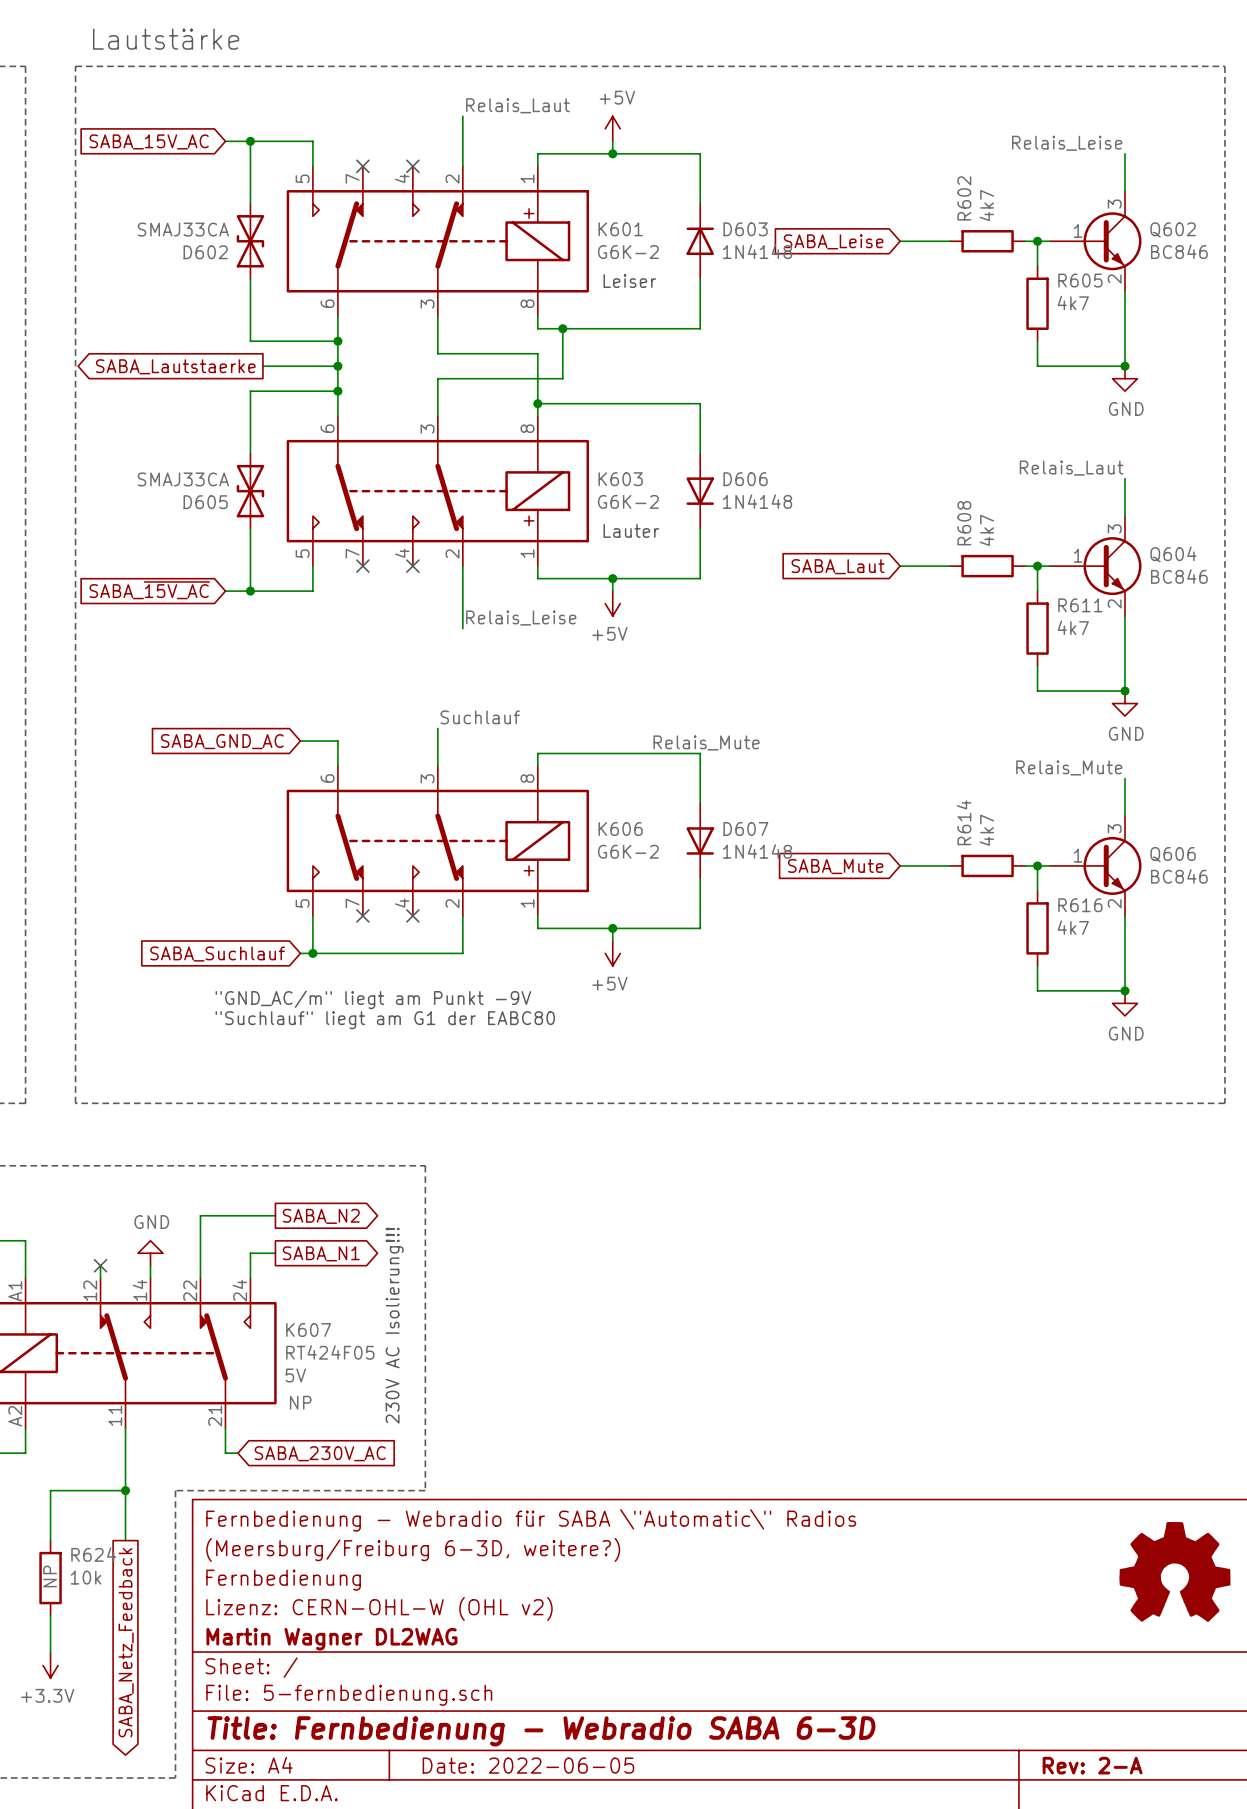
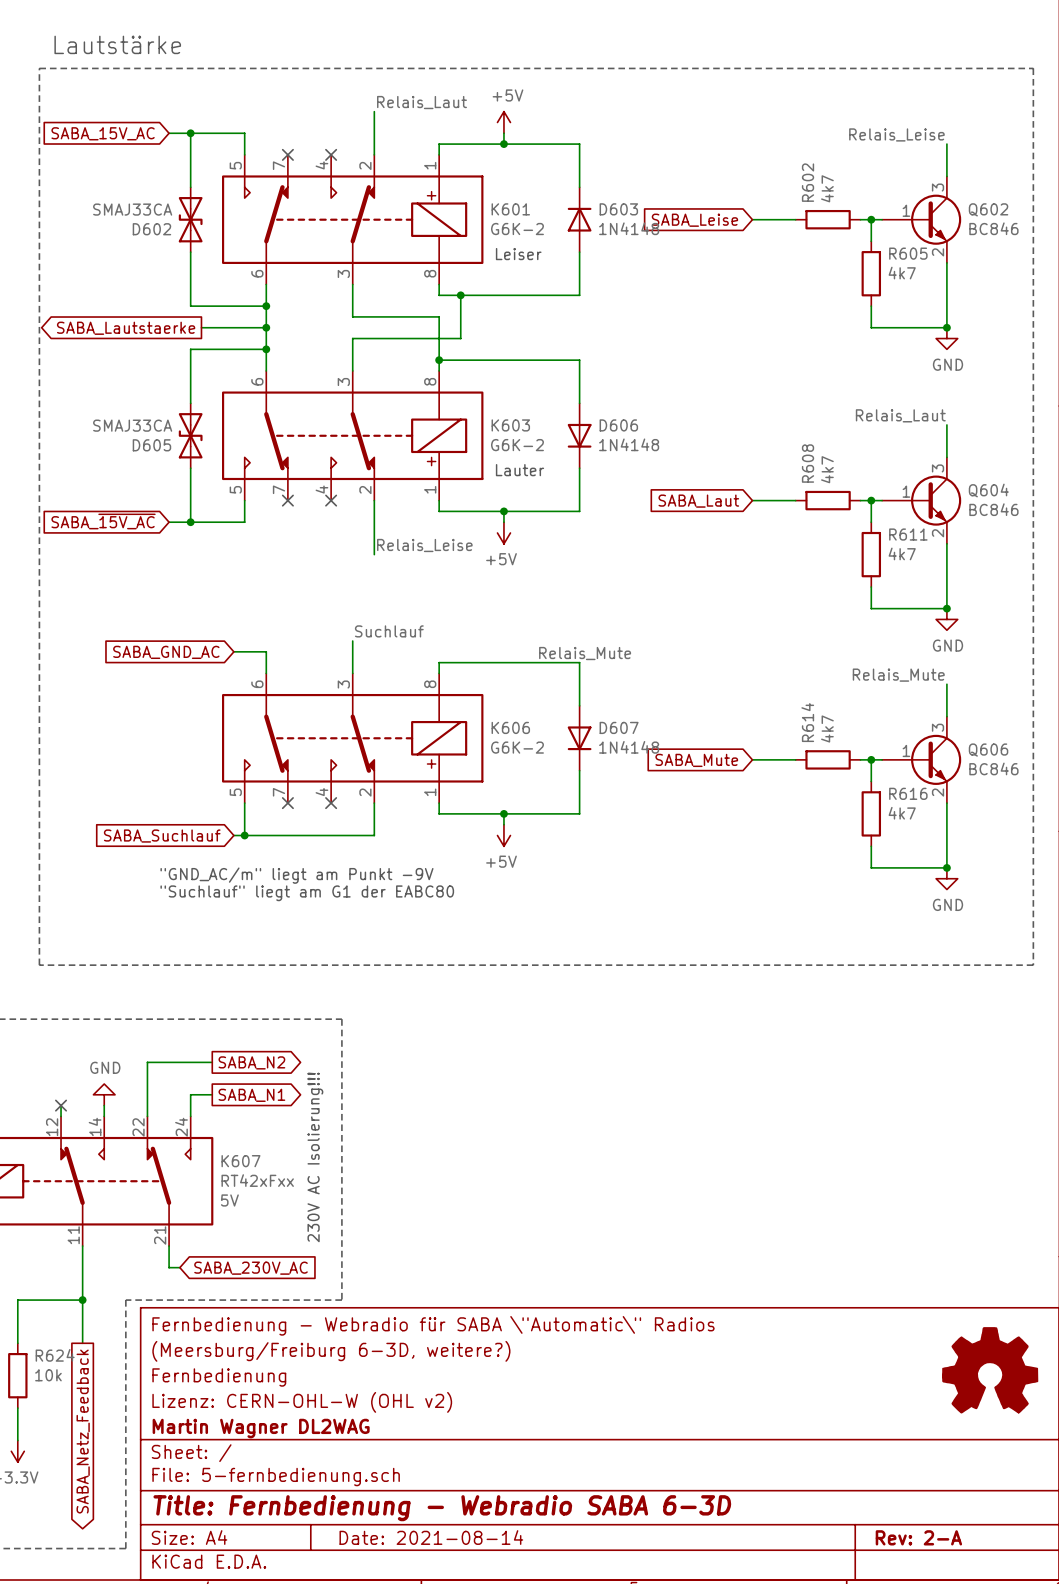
K607 value: RT424F05 (330, 1352) -> RT42xFxx (257, 1180)
K607 text: NP (300, 1402) -> none
R624 text: NP (50, 1576) -> none
title block: Date: 2022-06-05 (528, 1765) -> Date: 2021-08-14 (431, 1537)

